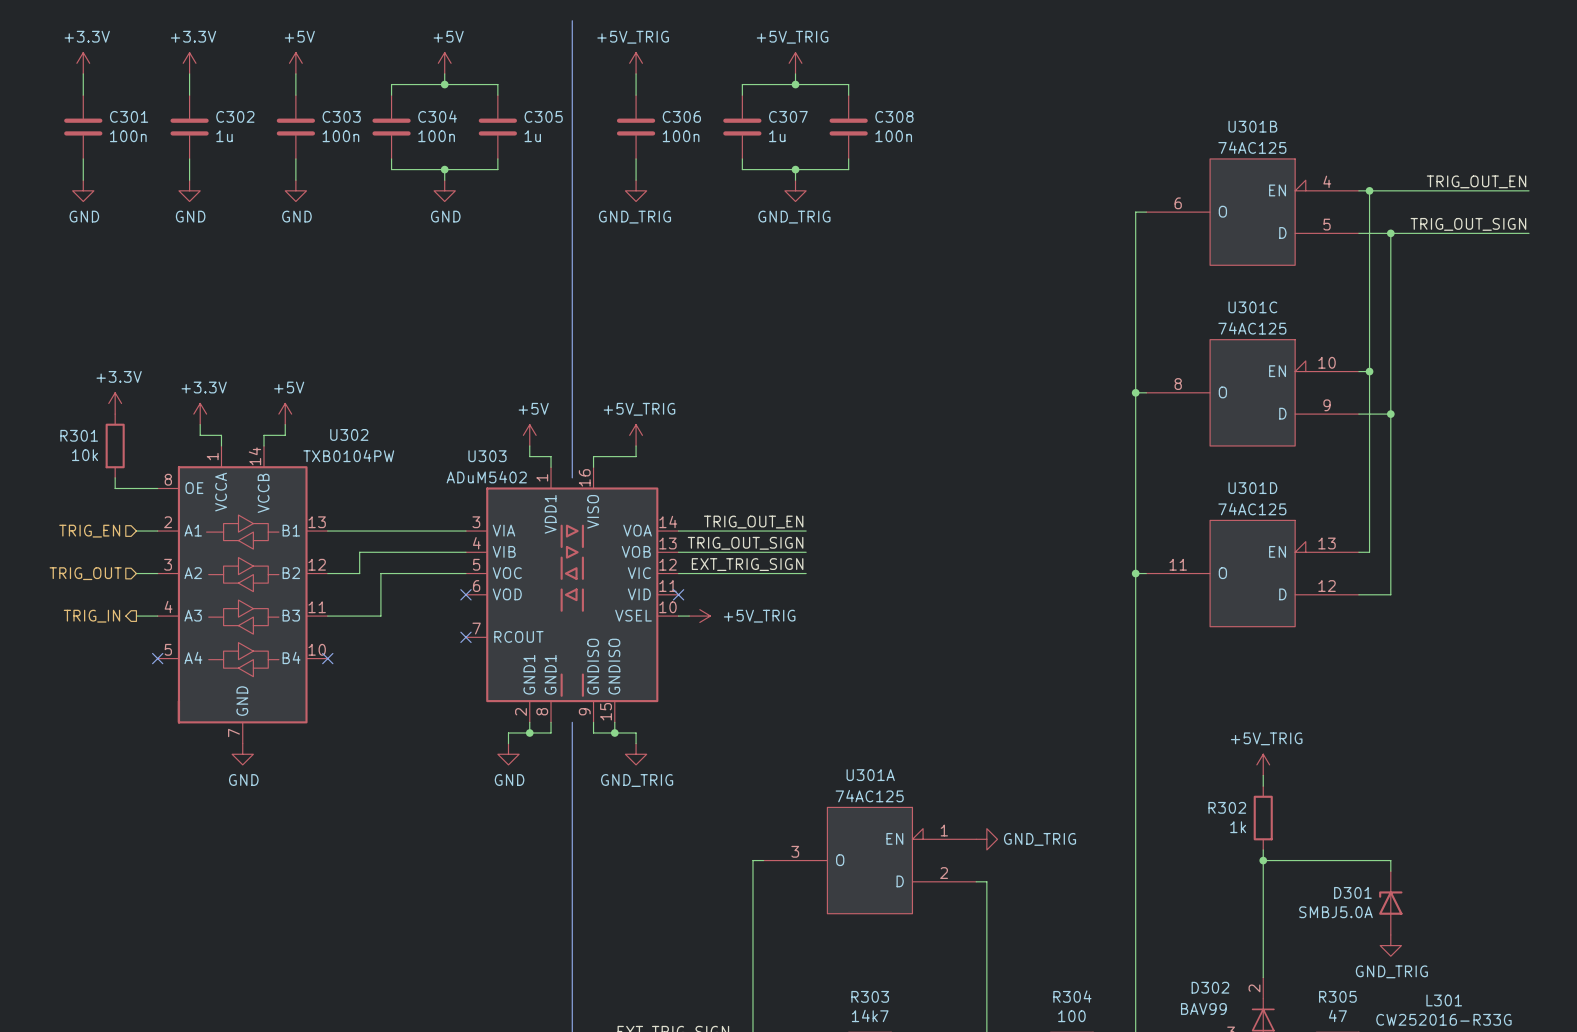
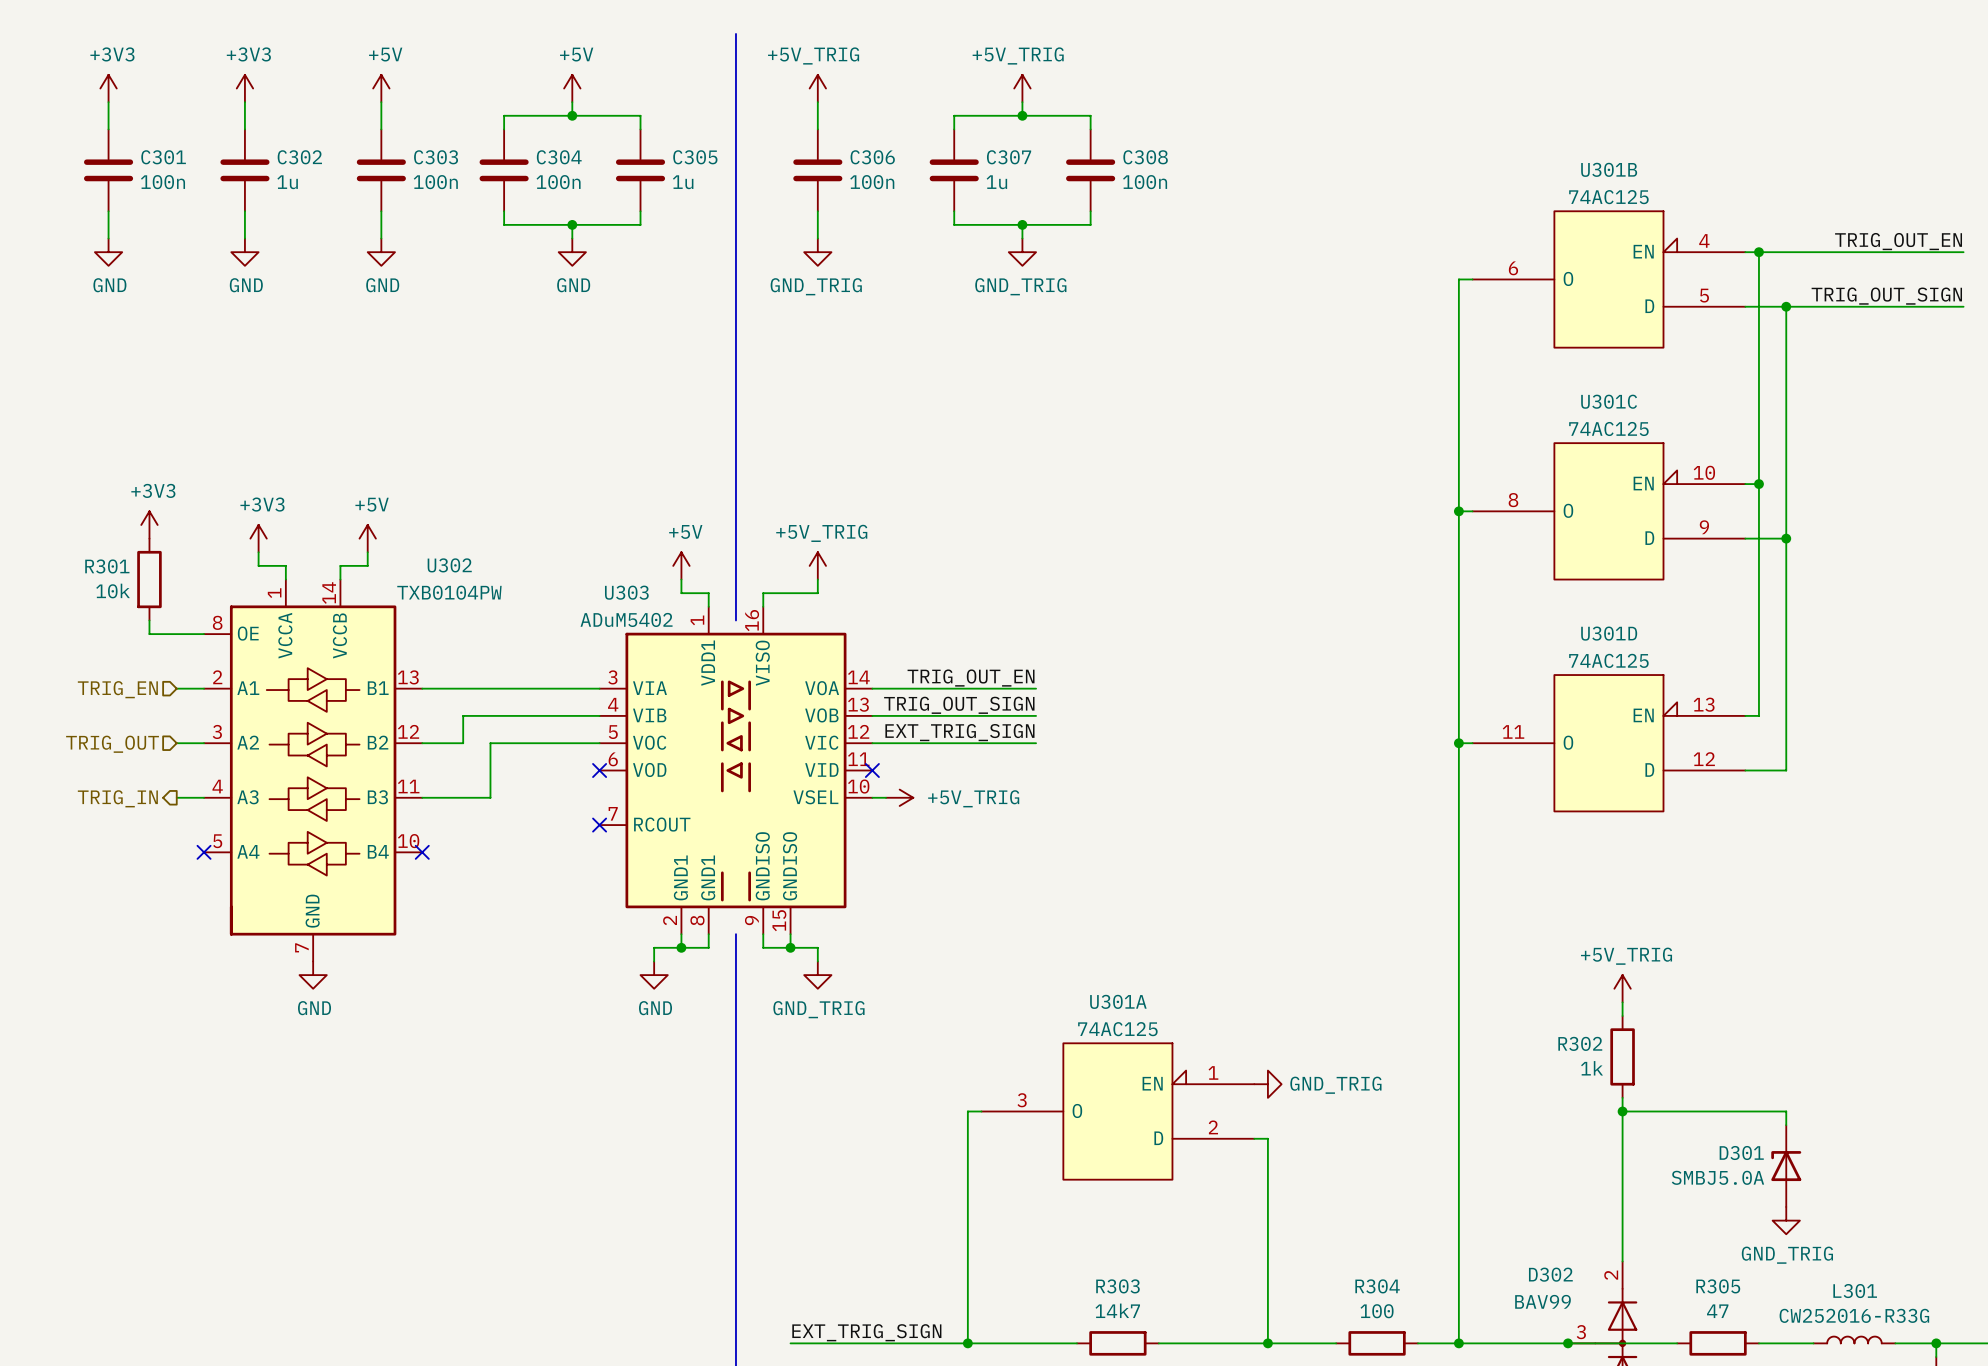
power symbol: +3.3V (83, 63) -> +3V3 (108, 88)
power symbol: +3.3V (189, 63) -> +3V3 (244, 88)
power symbol: +3.3V (115, 403) -> +3V3 (149, 524)
power symbol: +3.3V (200, 414) -> +3V3 (258, 538)

